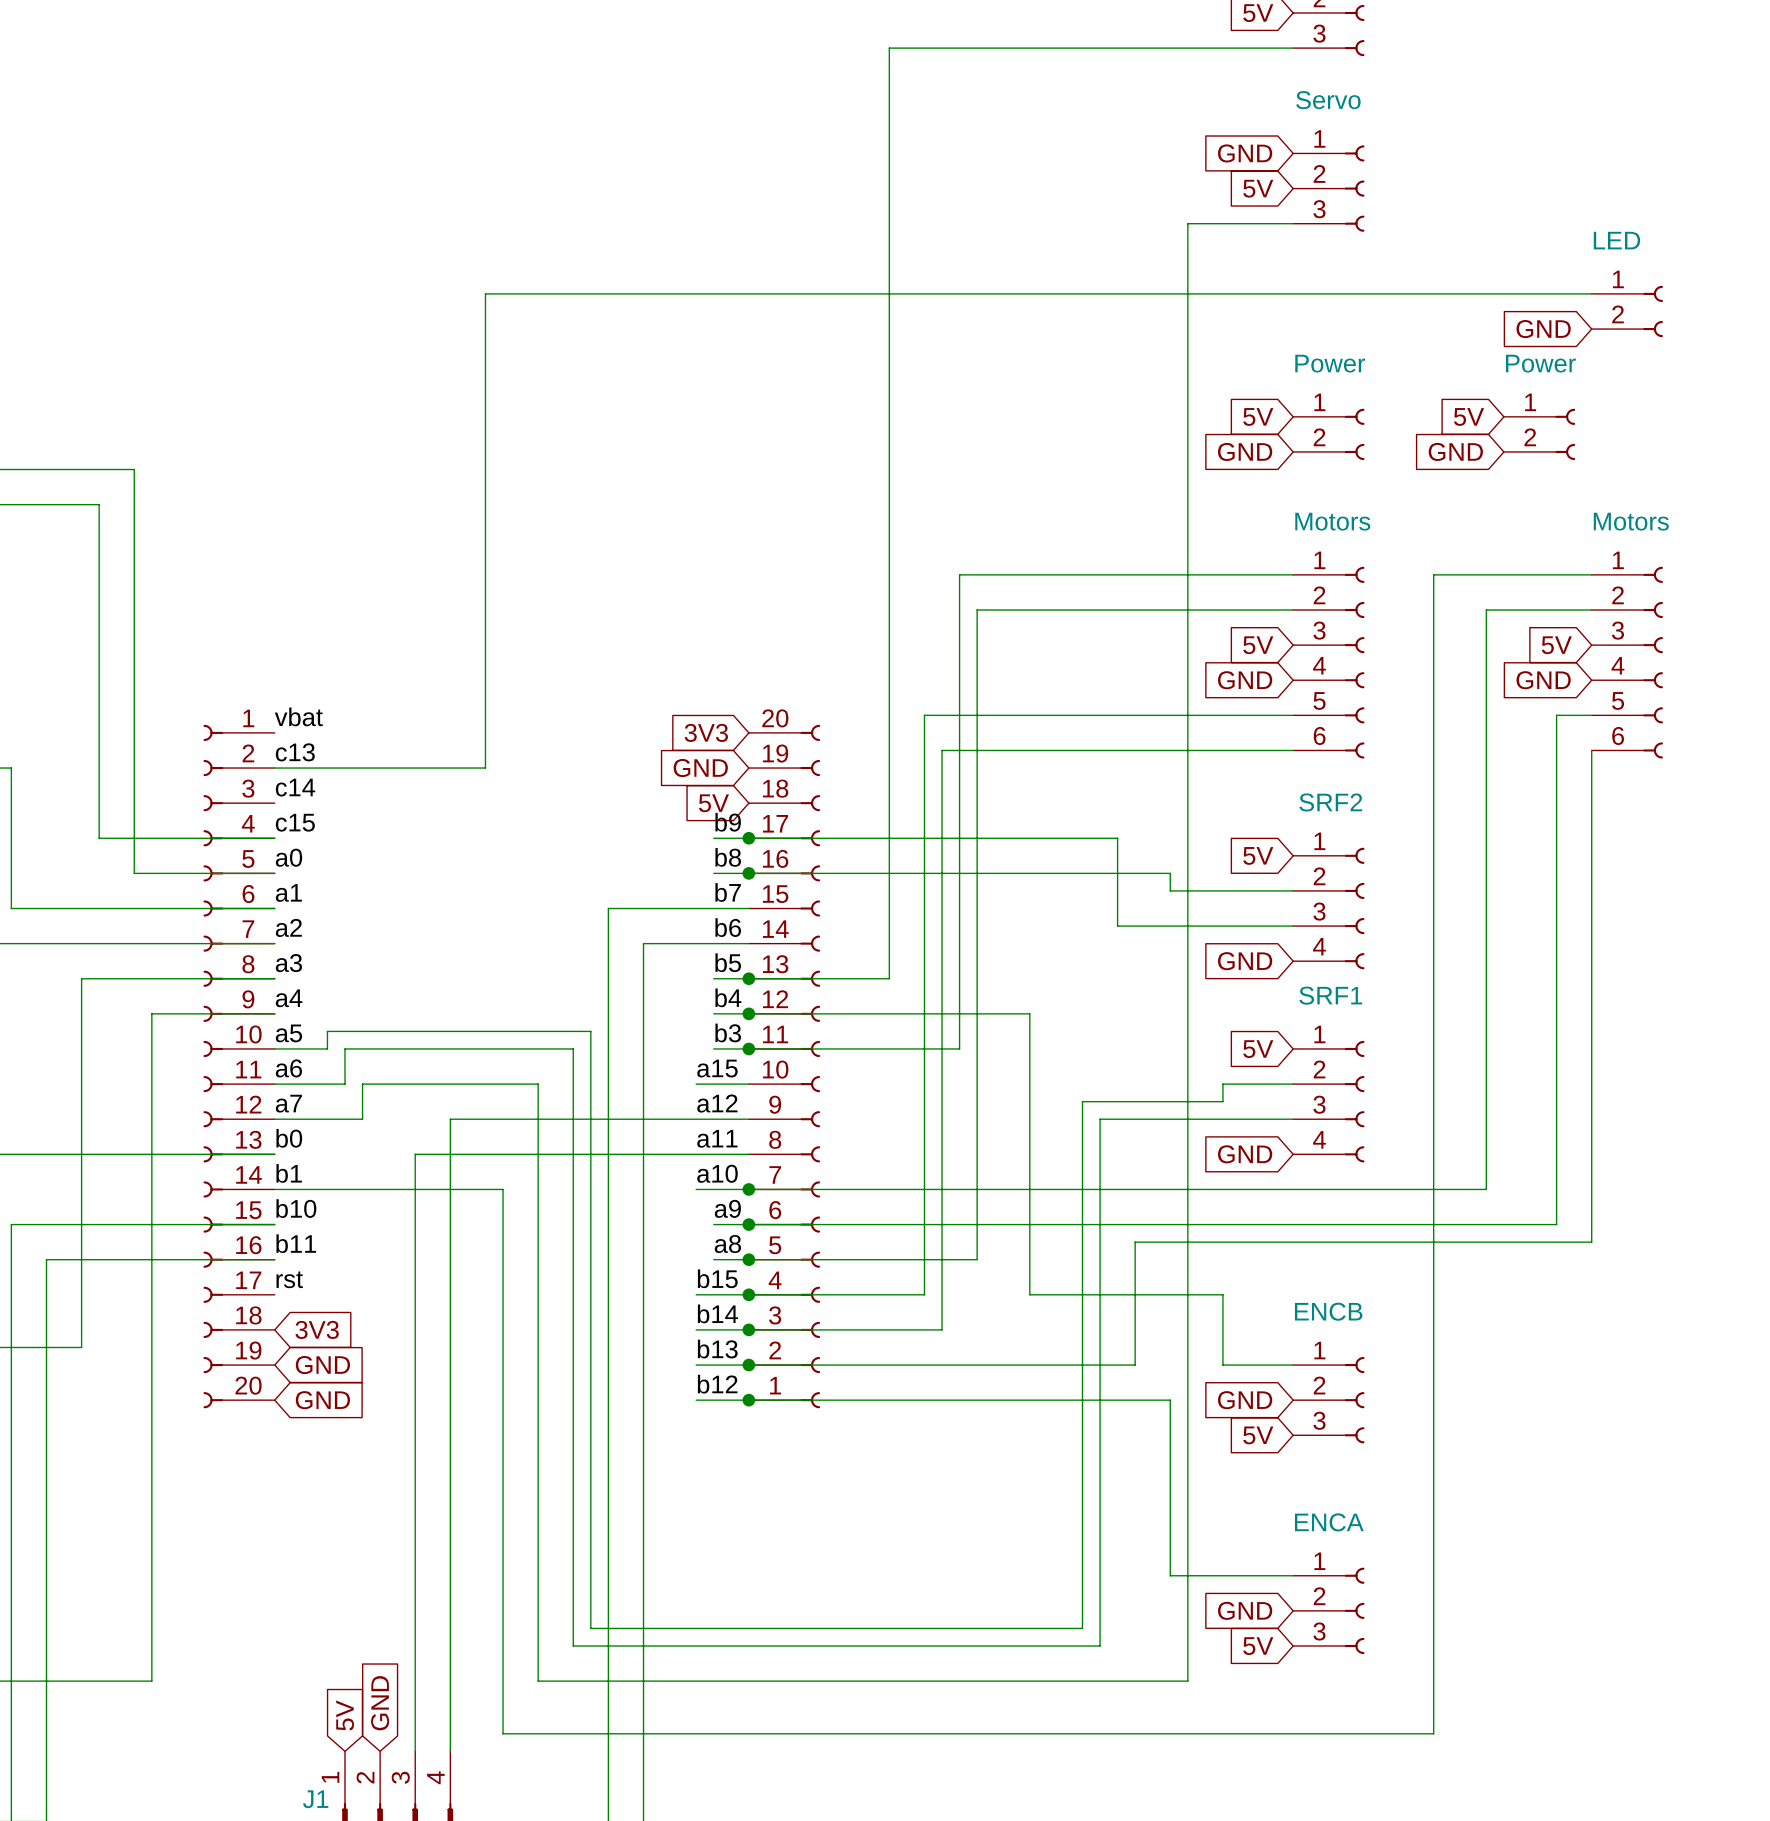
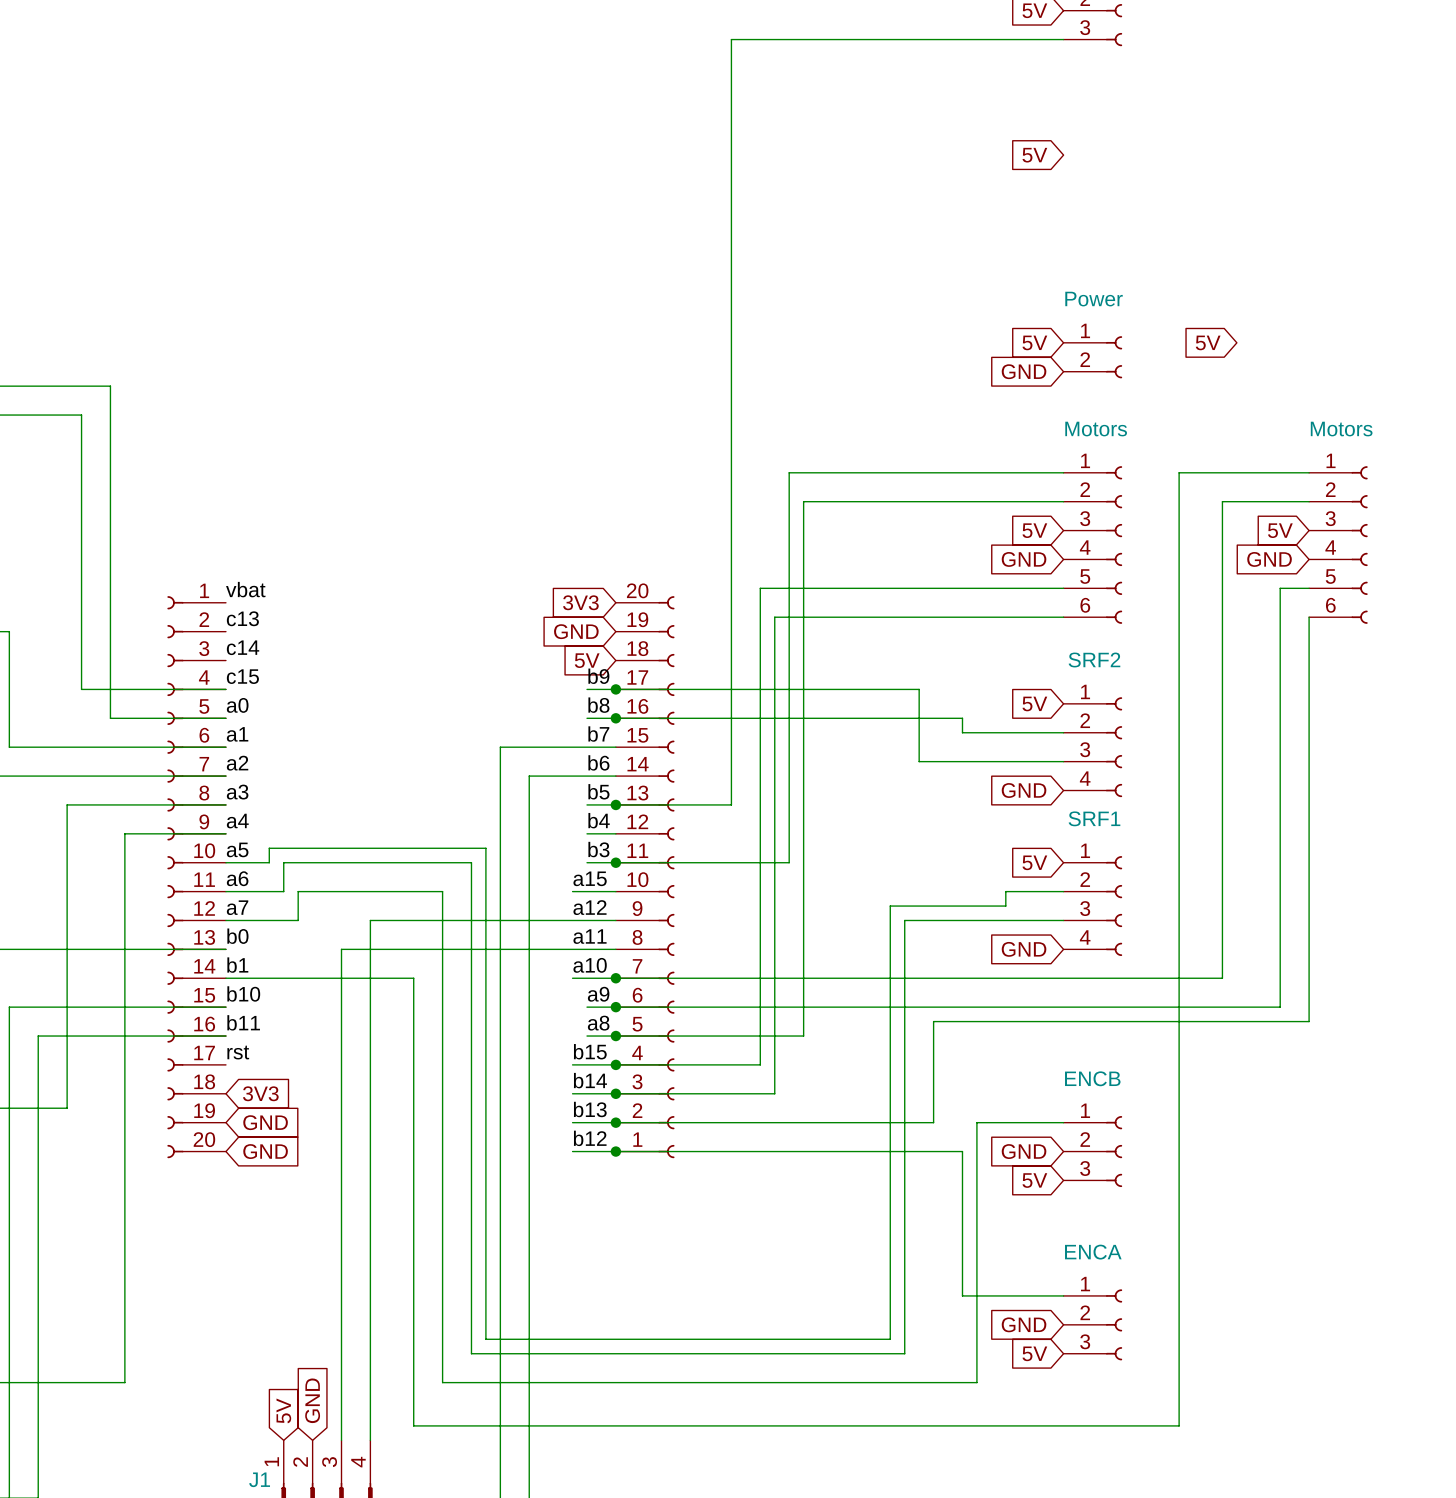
global label: GND (1245, 153) -> none
part: Servo (1328, 188) -> none
wire: (1293, 223) (1187, 223) (1187, 1365) -> none
wire: (1591, 293) (485, 293) (485, 768) (274, 768) -> none
part: LED (1627, 311) -> none
global label: GND (1543, 329) -> none
part: Power (1539, 434) -> none
global label: GND (1455, 451) -> none
wire: (748, 1013) (1029, 1013) (1029, 1294) (1222, 1294) (1222, 1365) -> (976, 1122) (1005, 1122)
junction: (748, 1013) -> none

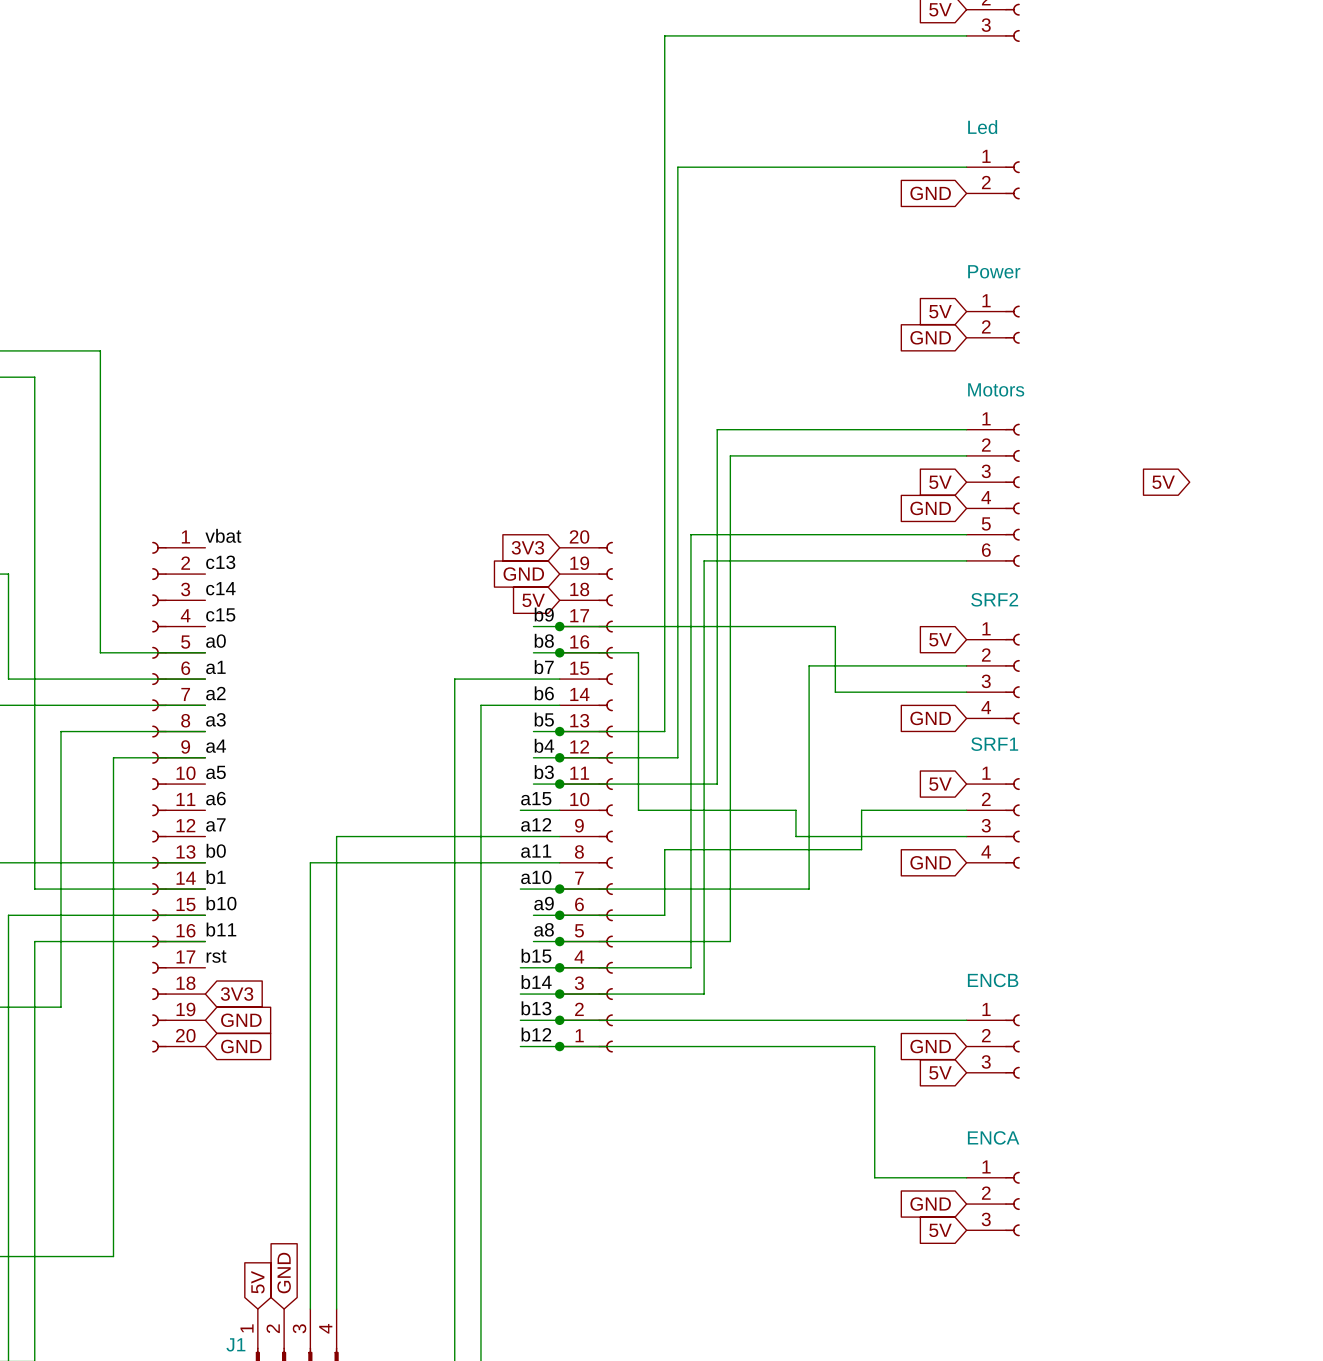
global label: 5V (1034, 155) -> none
wire: none -> (966, 167) (677, 167) (677, 757) (559, 757)
part: none -> Led (993, 180)
global label: none -> GND (930, 193)
global label: 5V (1208, 342) -> none
wire: (38, 415) (81, 415) (81, 689) (225, 689) -> (34, 377) (34, 889) (205, 889)
wire: (1309, 472) (1179, 472) (1179, 1425) (413, 1425) (413, 978) (225, 978) -> none
wire: (1309, 501) (1222, 501) (1222, 978) (890, 978) (890, 1339) (485, 1339) (485, 848) (269, 848) (269, 862) (225, 862) -> none
part: Motors (1338, 545) -> none
global label: GND (1269, 559) -> none
wire: (1309, 588) (1280, 588) (1280, 1007) (731, 1007) -> (914, 810) (861, 810) (861, 849) (664, 849) (664, 915)
wire: (1309, 617) (1309, 1021) (933, 1021) (933, 1122) -> (887, 1020) (848, 1020)
wire: (702, 718) (962, 718) (962, 732) -> (638, 652) (638, 810) (795, 810) (795, 836) (822, 836)
junction: none -> (559, 757)
wire: (225, 891) (283, 891) (283, 862) (471, 862) (471, 1353) (904, 1353) (904, 920) -> none
wire: (1005, 891) (1005, 906) (890, 906) -> (874, 665) (809, 665) (809, 823)
wire: (225, 920) (298, 920) (298, 891) (442, 891) (442, 1382) (976, 1382) (976, 1122) -> none

